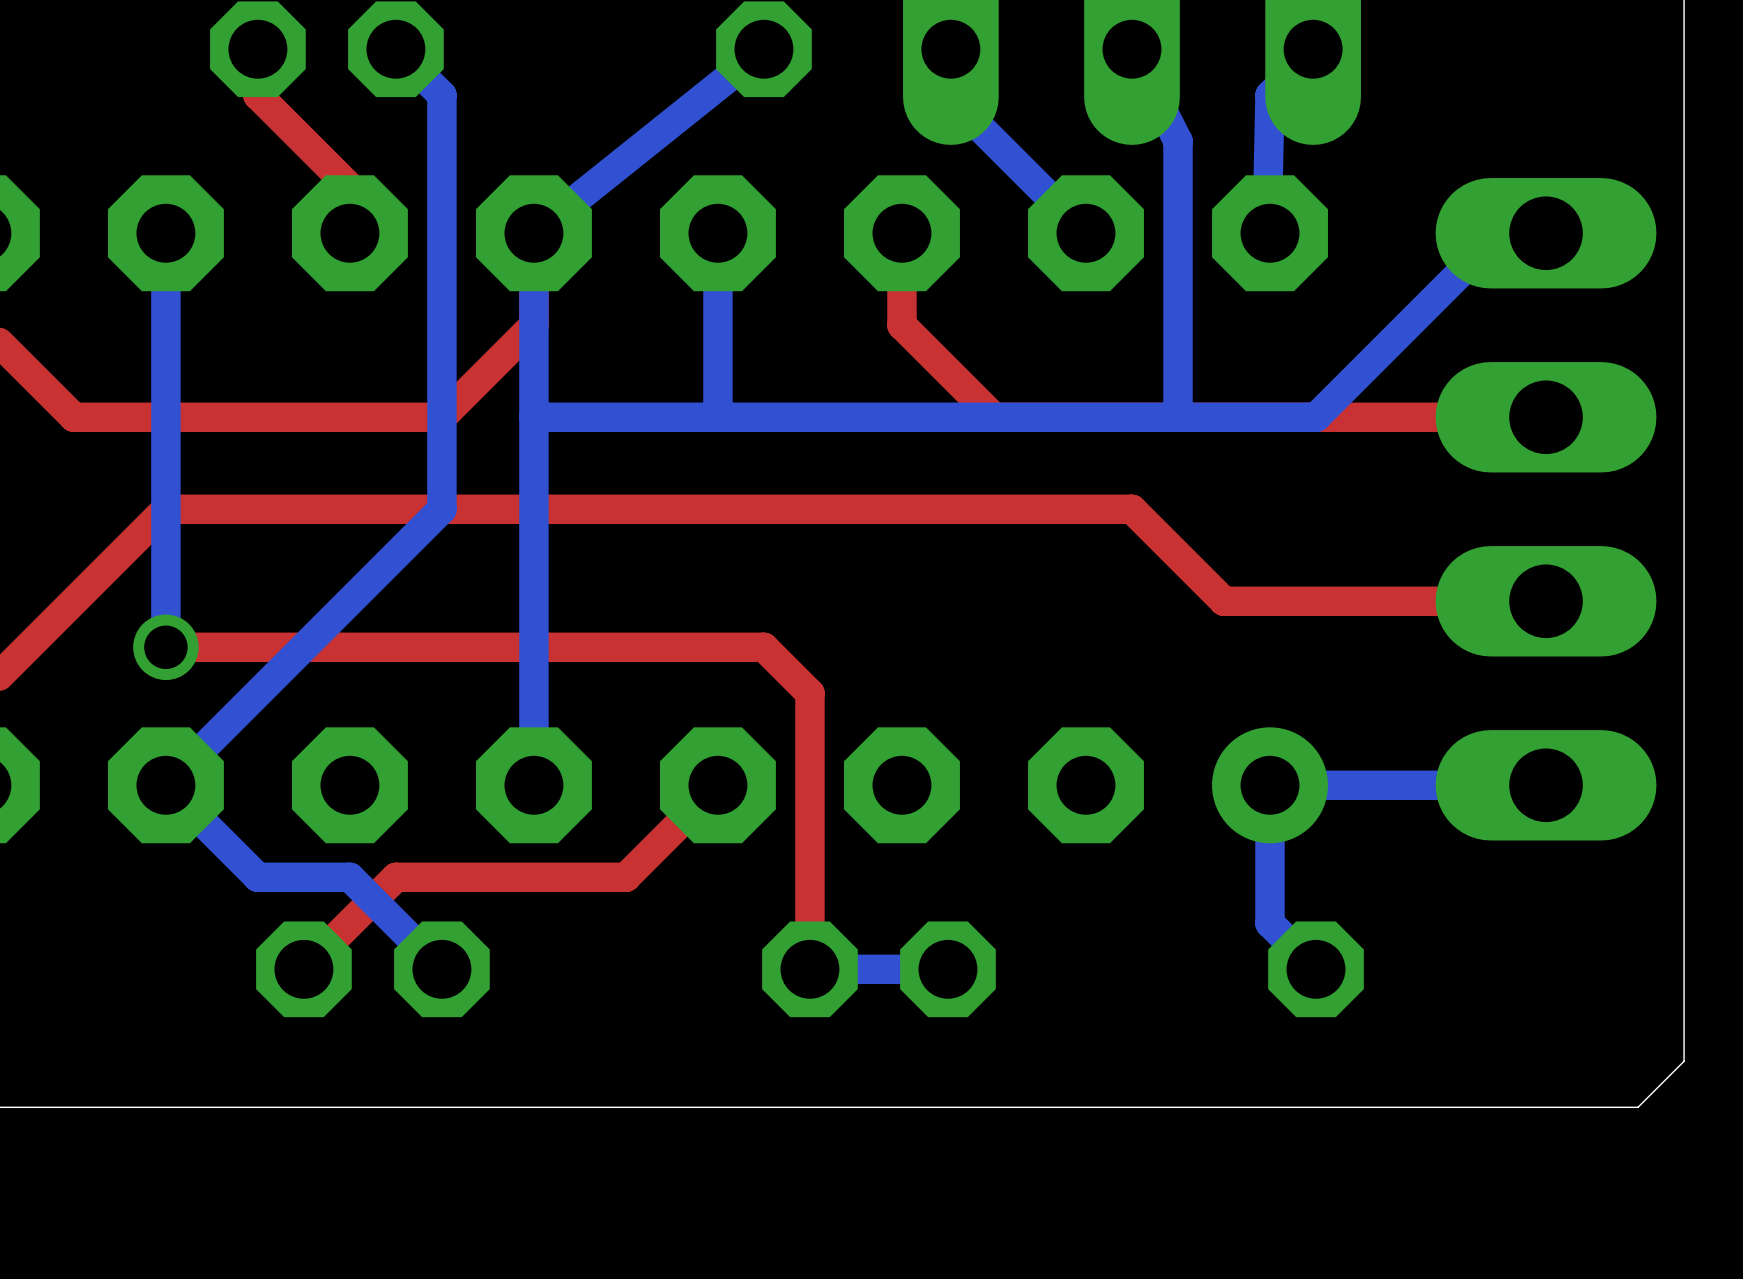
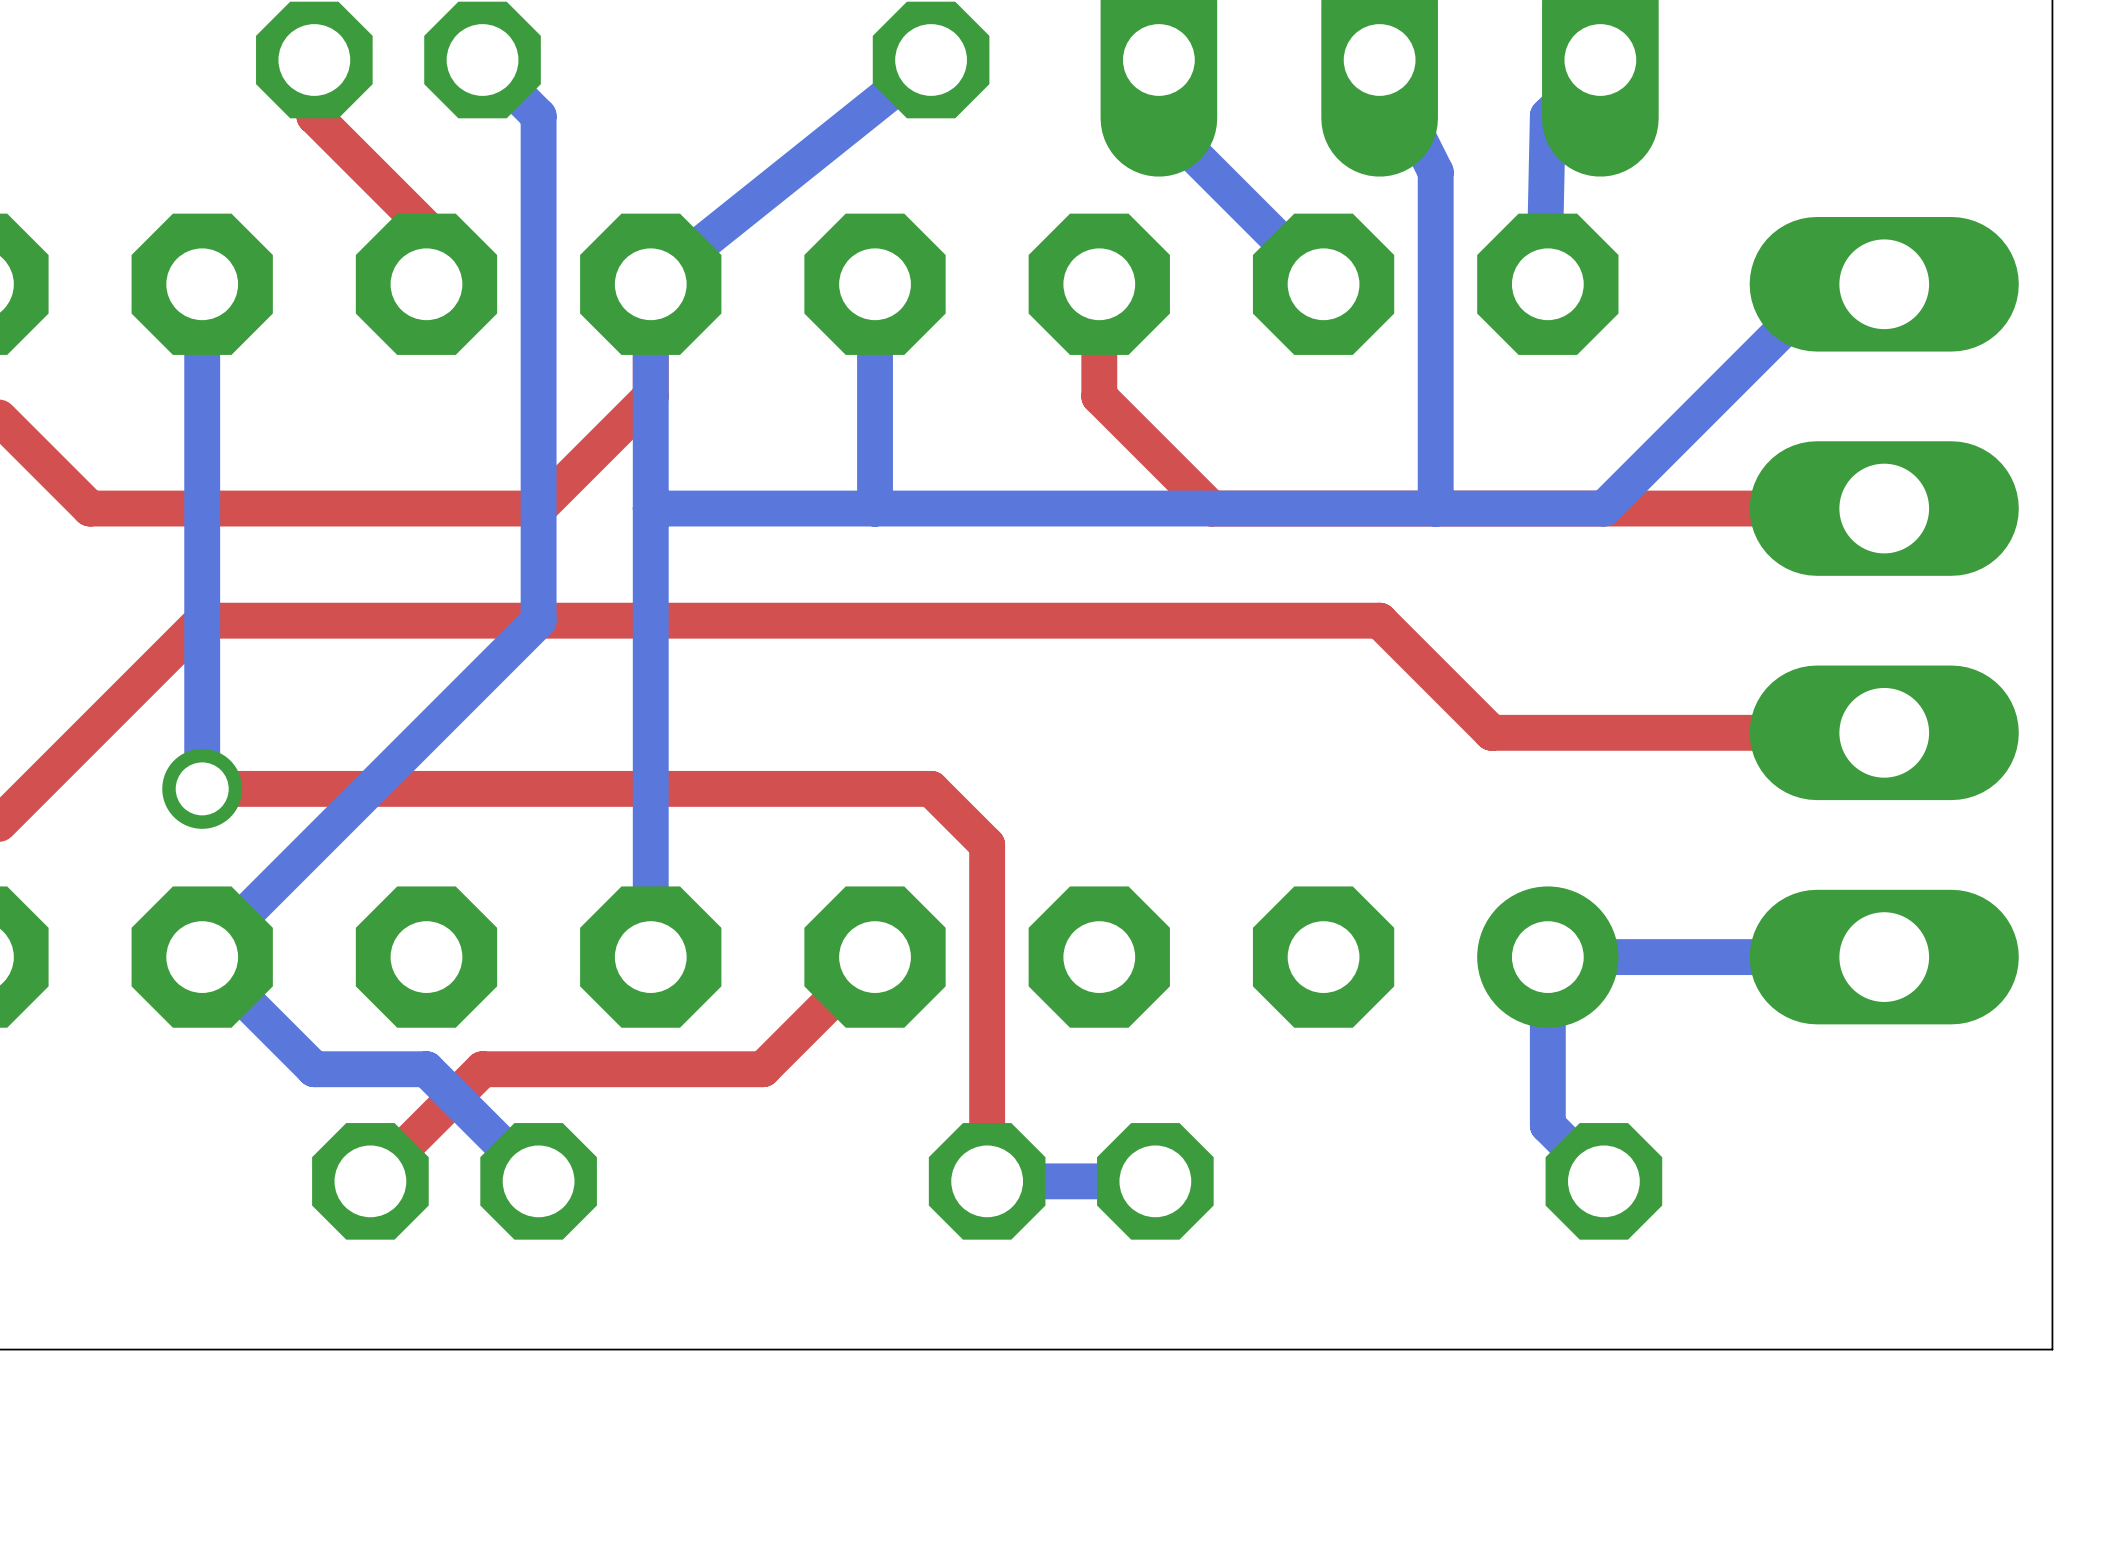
board edge: (1684, 1061) (1638, 1107) -> (2052, 1293) (2052, 1349) (1996, 1349)

